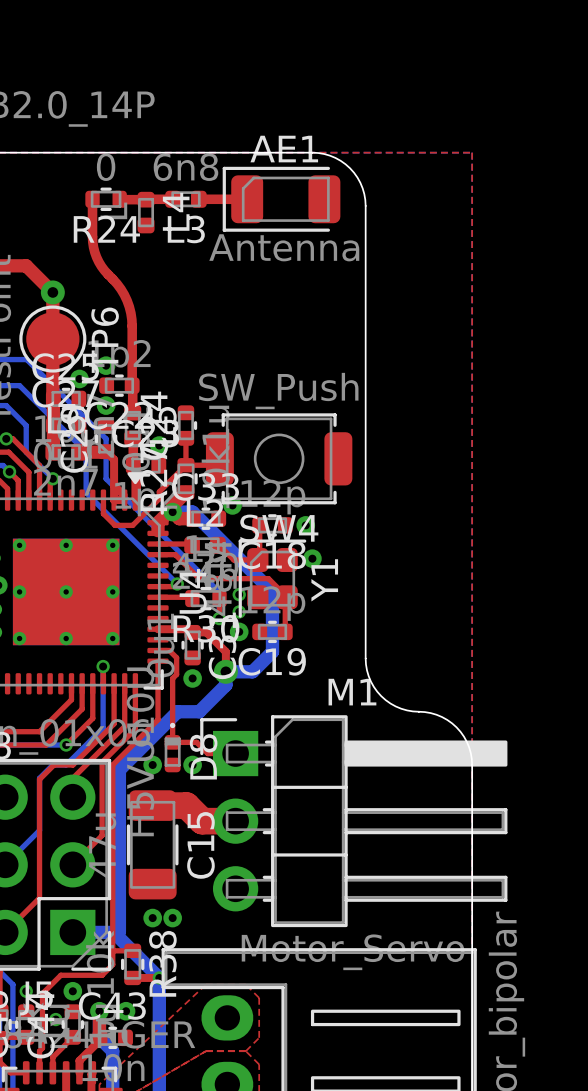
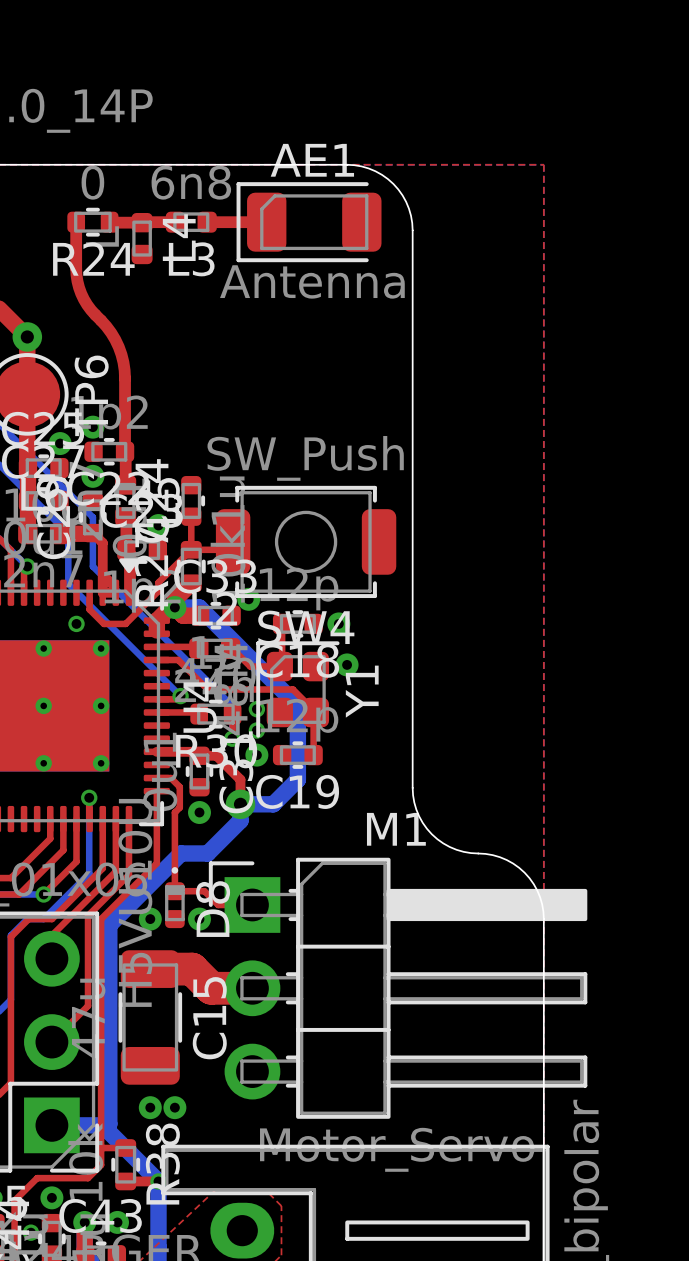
via: none -> (76, 623)

